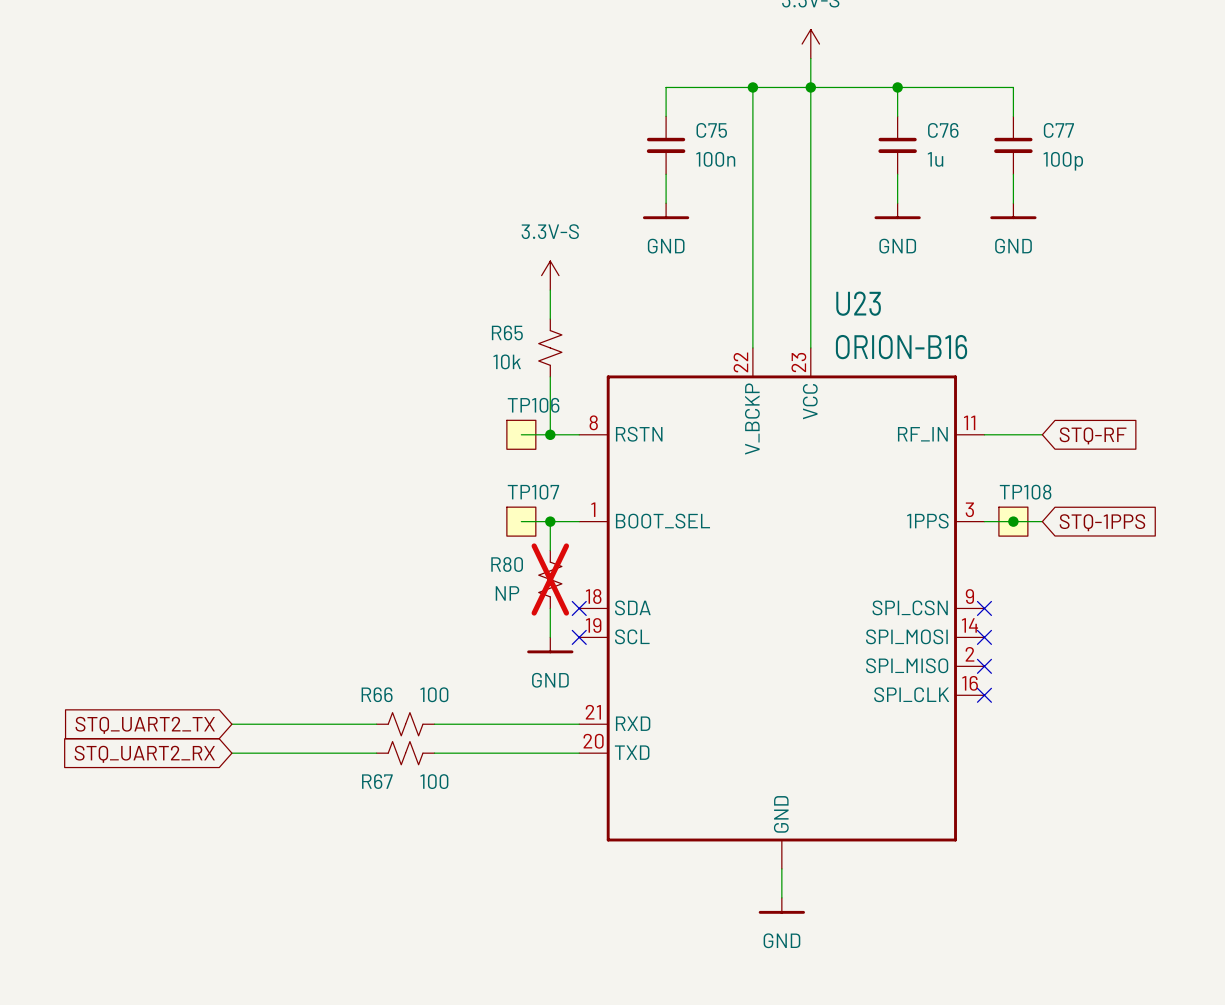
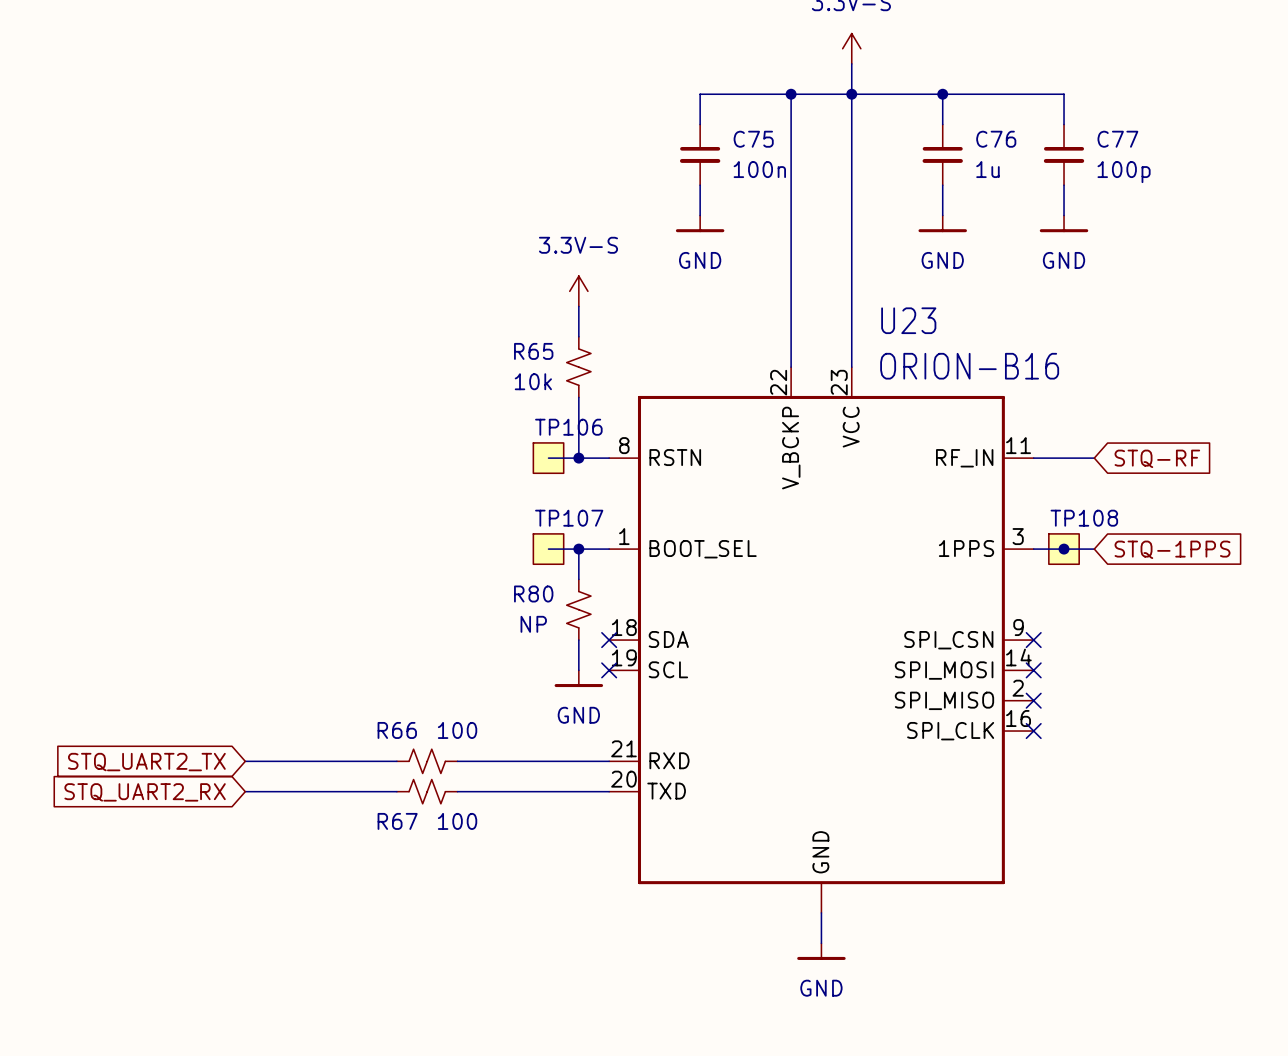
R80 do-not-place cross: (550, 579) -> none

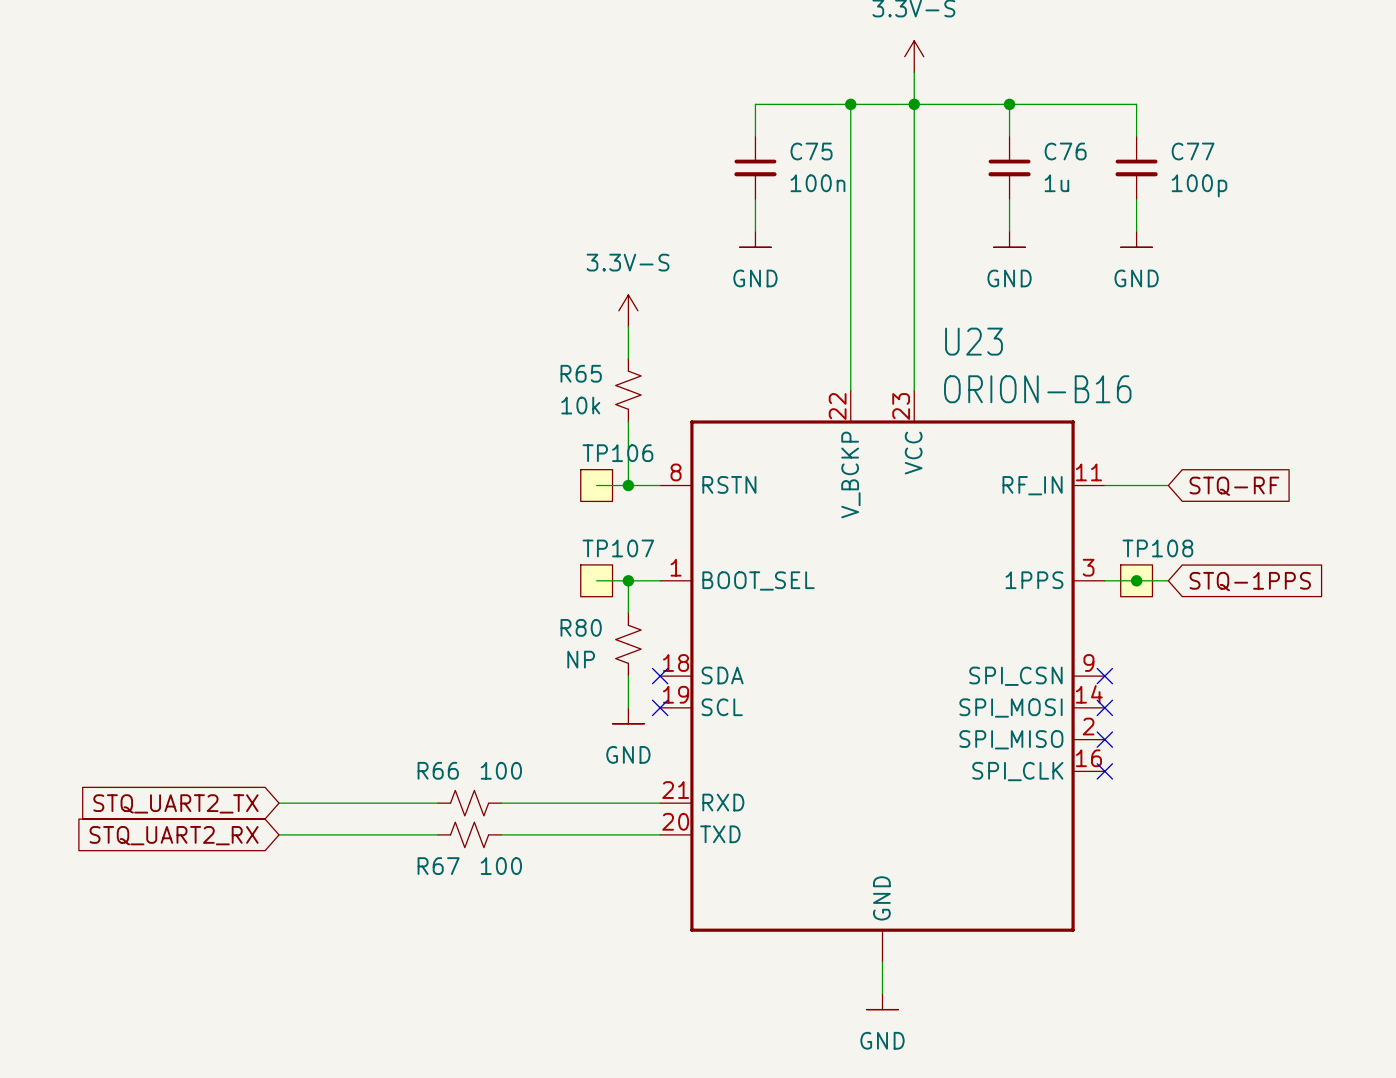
power symbol shape: [675, 215, 725, 233] -> [739, 231, 772, 248]
power symbol shape: [918, 215, 967, 233] -> [993, 231, 1026, 248]
power symbol shape: [1039, 215, 1089, 233] -> [1120, 231, 1153, 248]
power symbol shape: [554, 670, 604, 688] -> [612, 707, 645, 724]
power symbol shape: [797, 943, 846, 960] -> [866, 993, 899, 1010]

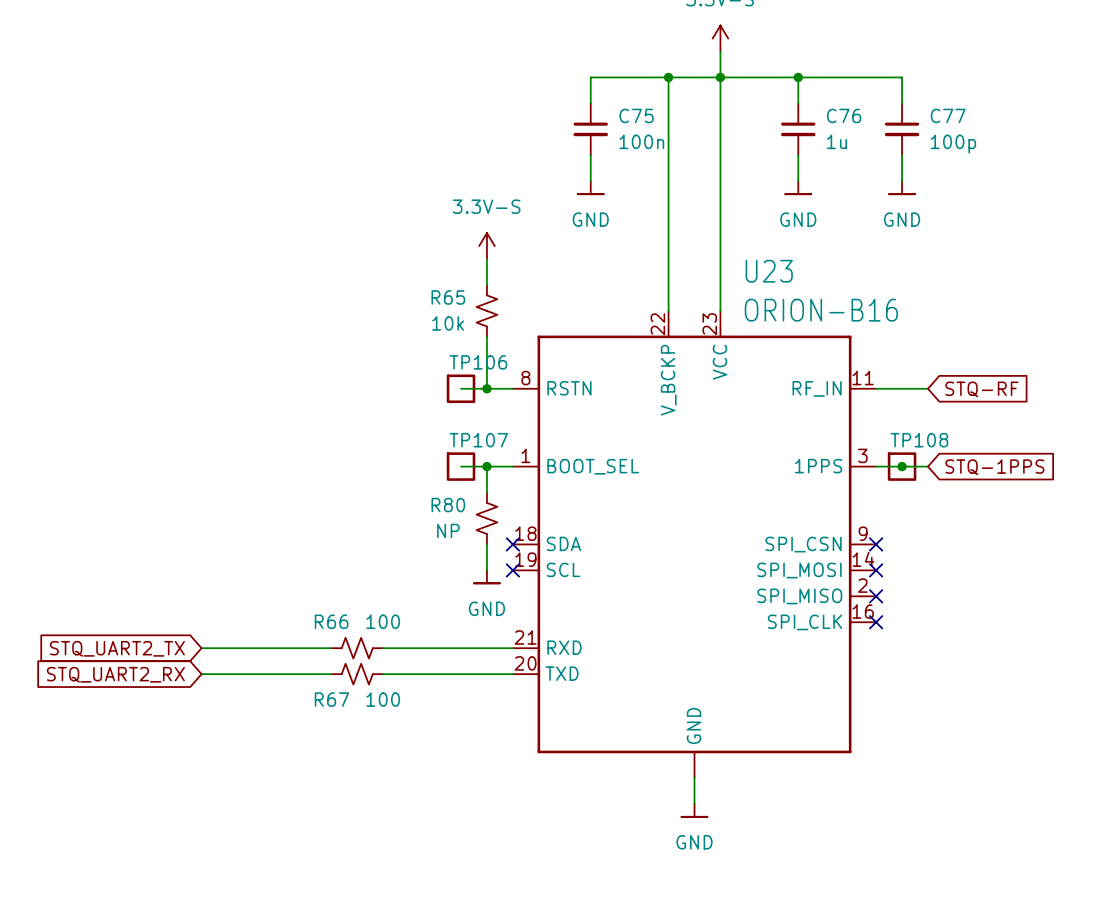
TP106 symbol: [580, 469, 613, 502] -> [446, 374, 476, 404]
TP107 symbol: [580, 564, 613, 597] -> [446, 452, 476, 481]
TP108 symbol: [1120, 564, 1153, 597] -> [887, 452, 917, 481]

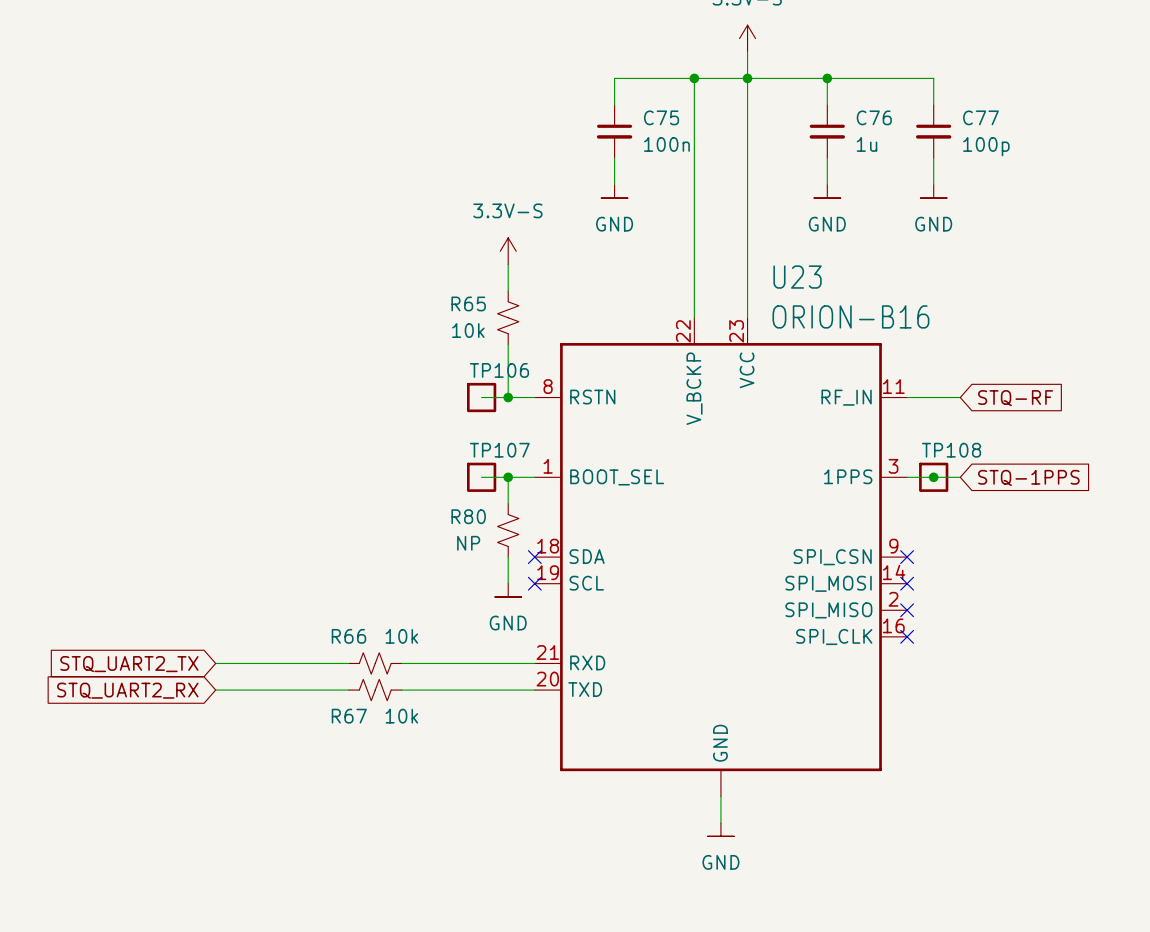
R66 value: 100 (383, 621) -> 10k (401, 636)
R67 value: 100 (383, 699) -> 10k (401, 716)

